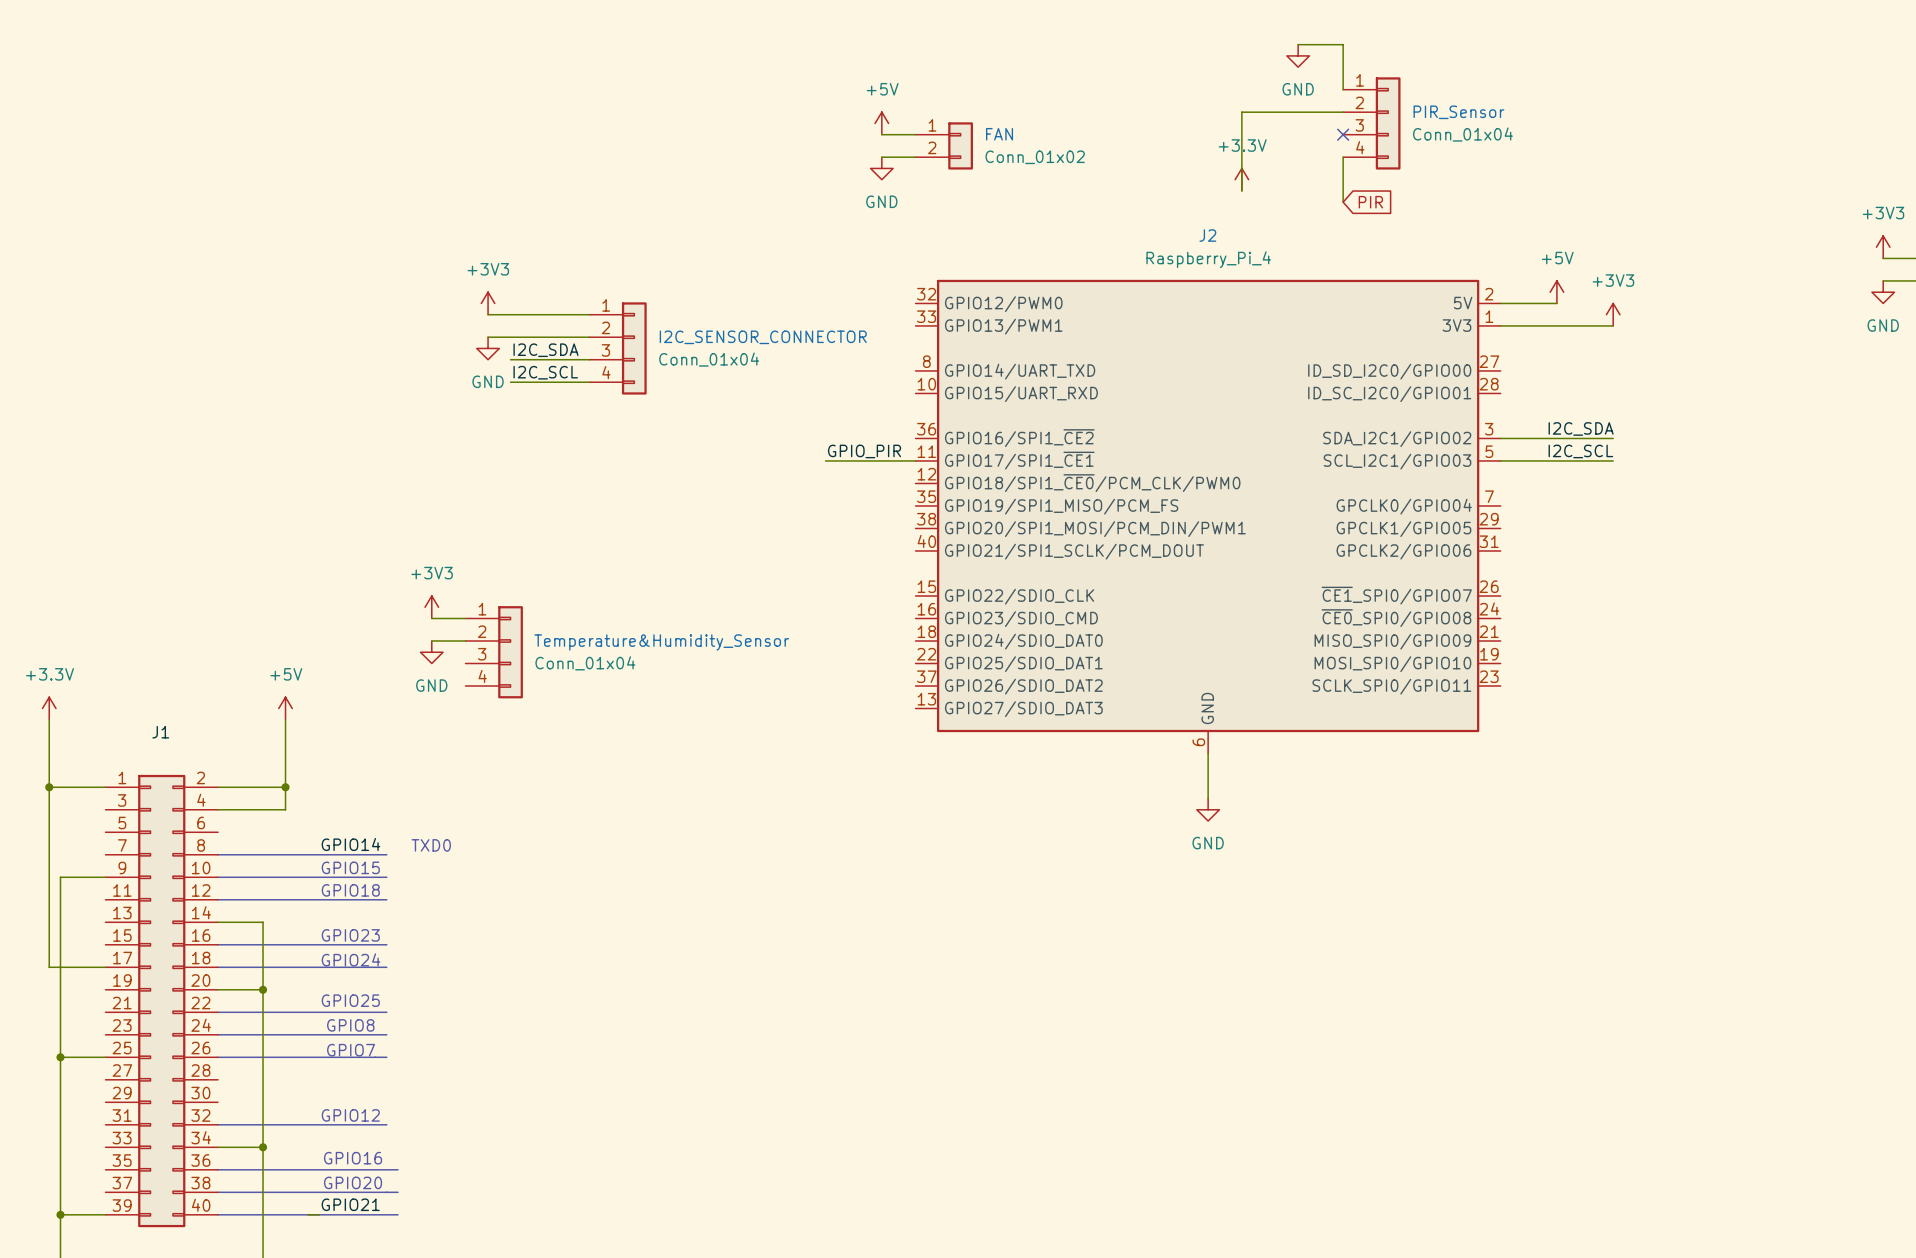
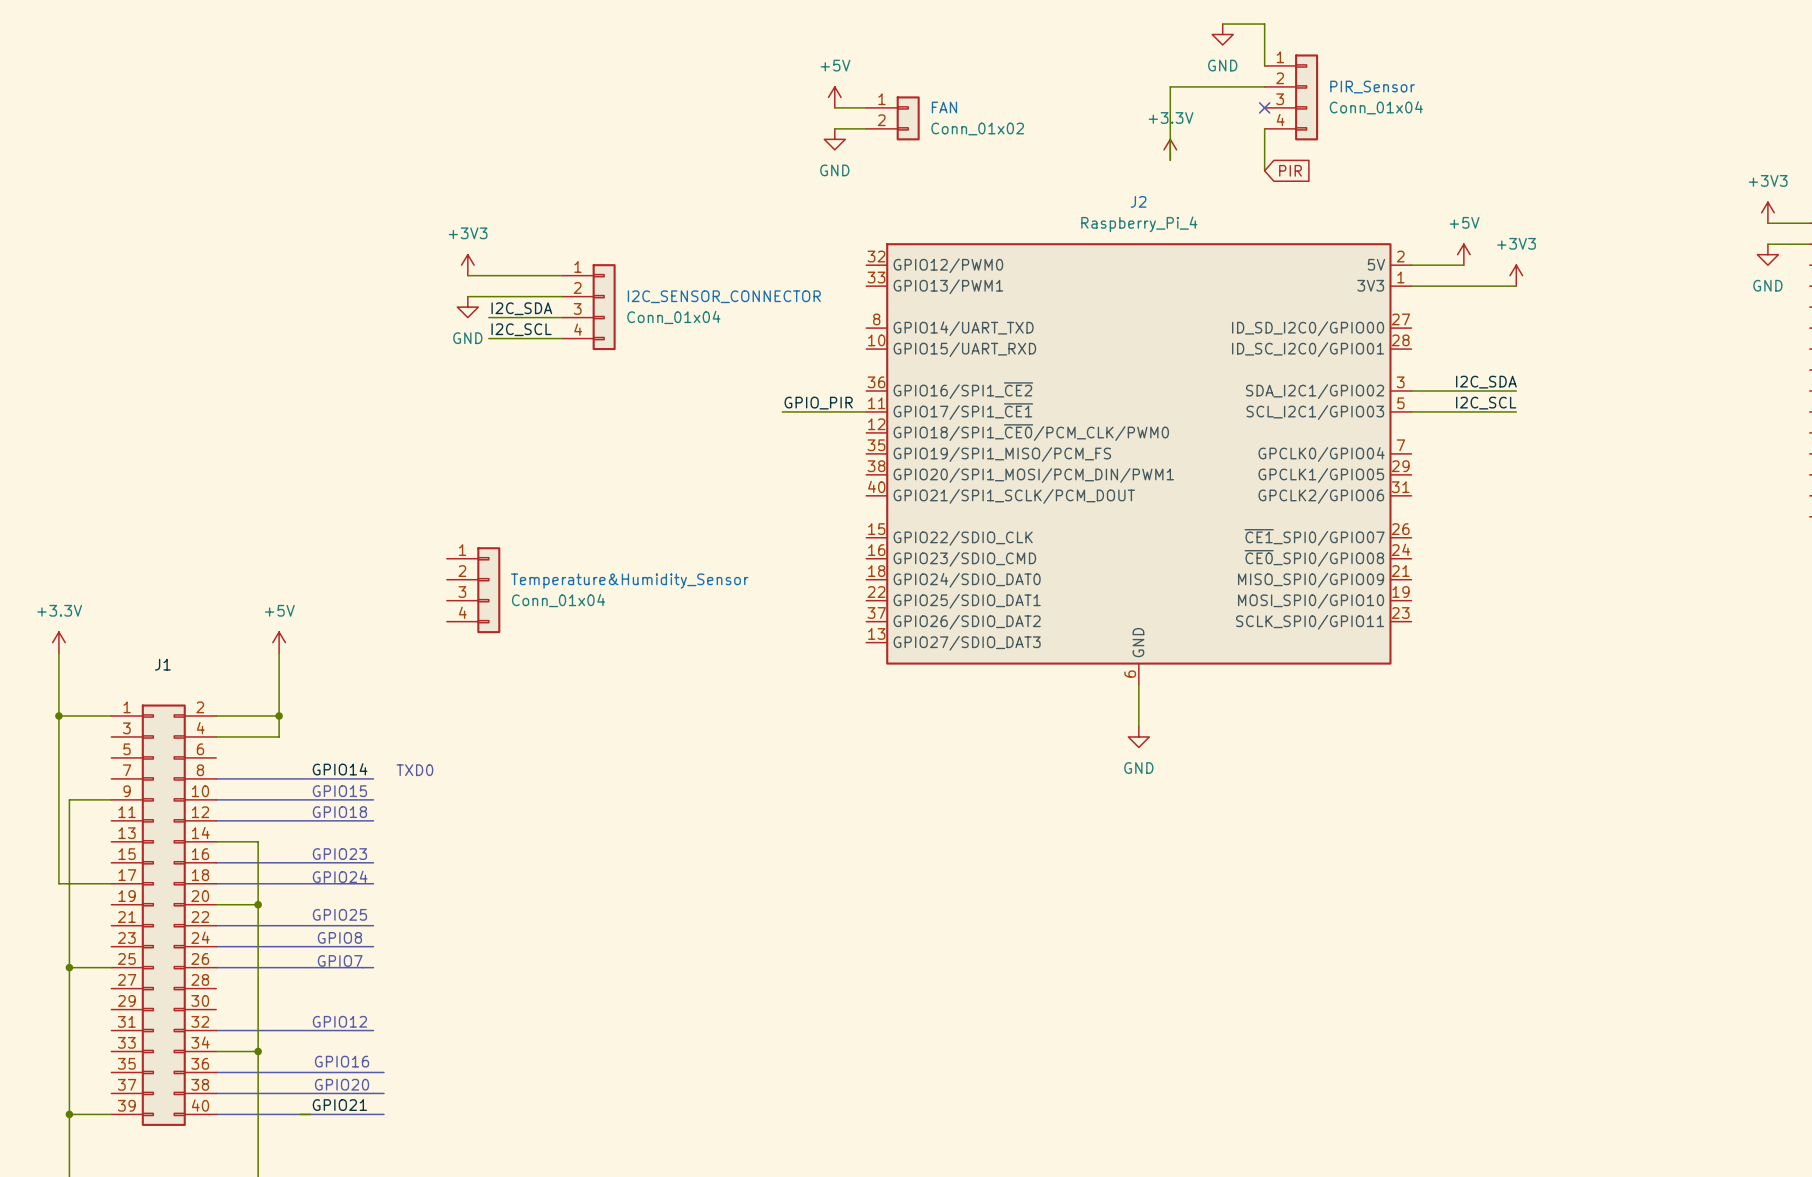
power symbol: +3V3 (431, 607) -> none
wire: (431, 618) (465, 618) -> none
wire: (431, 641) (465, 641) -> none
power symbol: GND (431, 652) -> none

